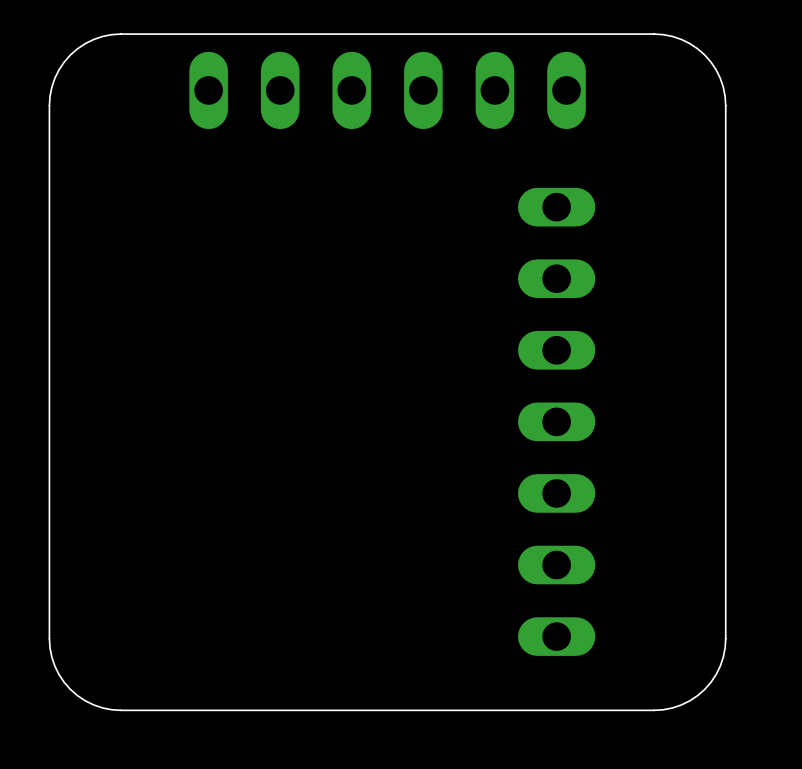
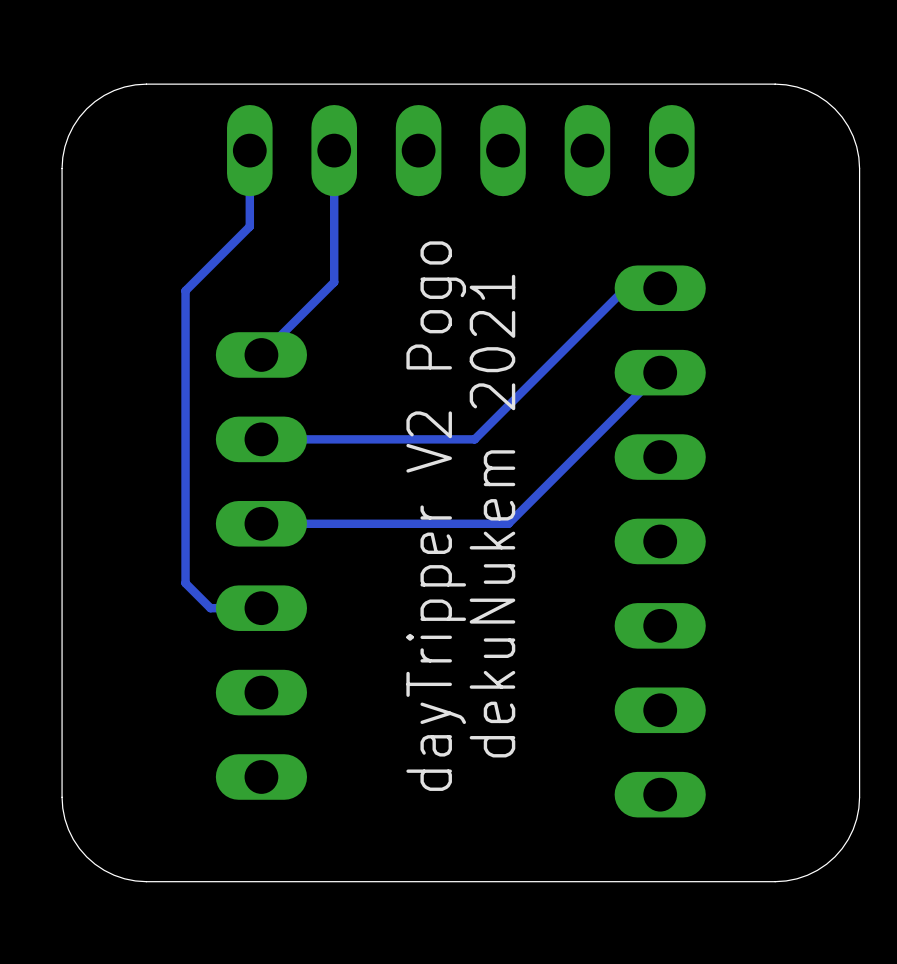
track: none -> (249, 150) (249, 226) (185, 290) (185, 583) (210, 608) (261, 608)
track: none -> (334, 150) (334, 282) (261, 354)
track: none -> (660, 288) (625, 288) (474, 439) (261, 439)
track: none -> (659, 372) (508, 523) (261, 523)
text: none -> dayTripper V2 Pogo (436, 516)
text: none -> dekuNukem 2021 (492, 516)
part: none -> (261, 565)

